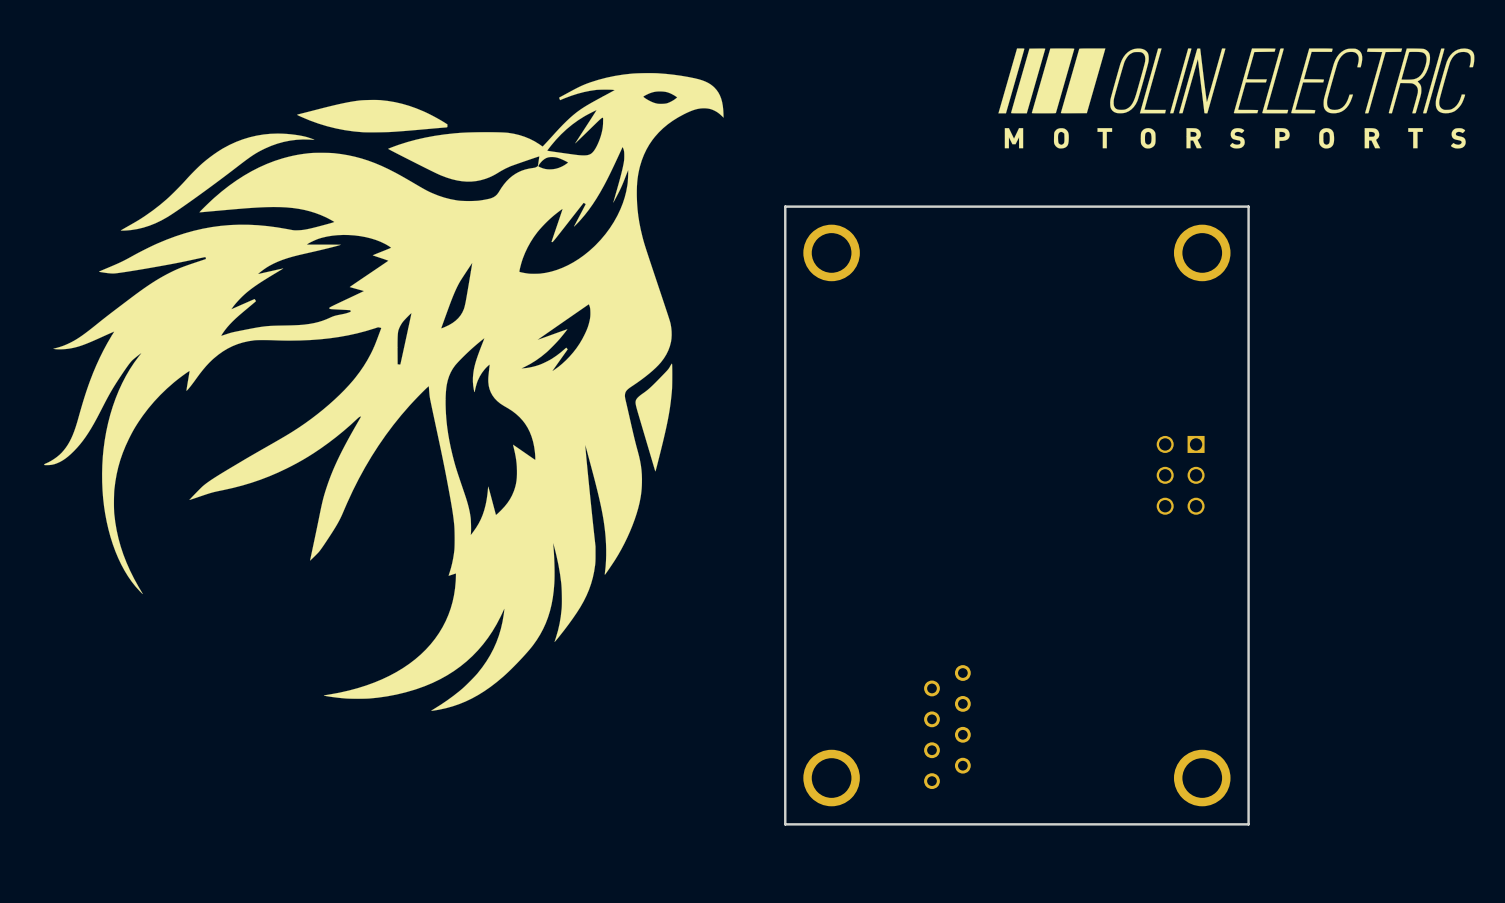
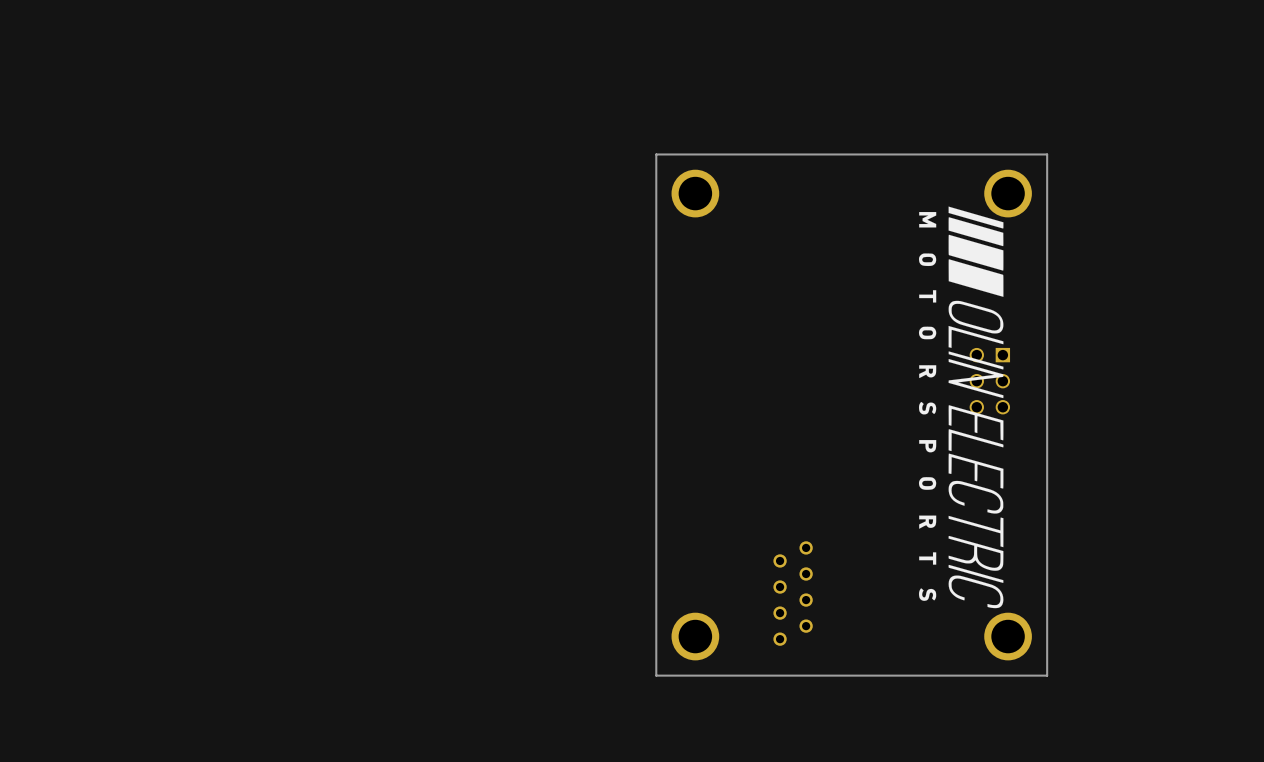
drawing: [998, 48, 1475, 149] -> none
drawing: [44, 73, 724, 711] -> none
drawing: none -> [918, 206, 1004, 609]

